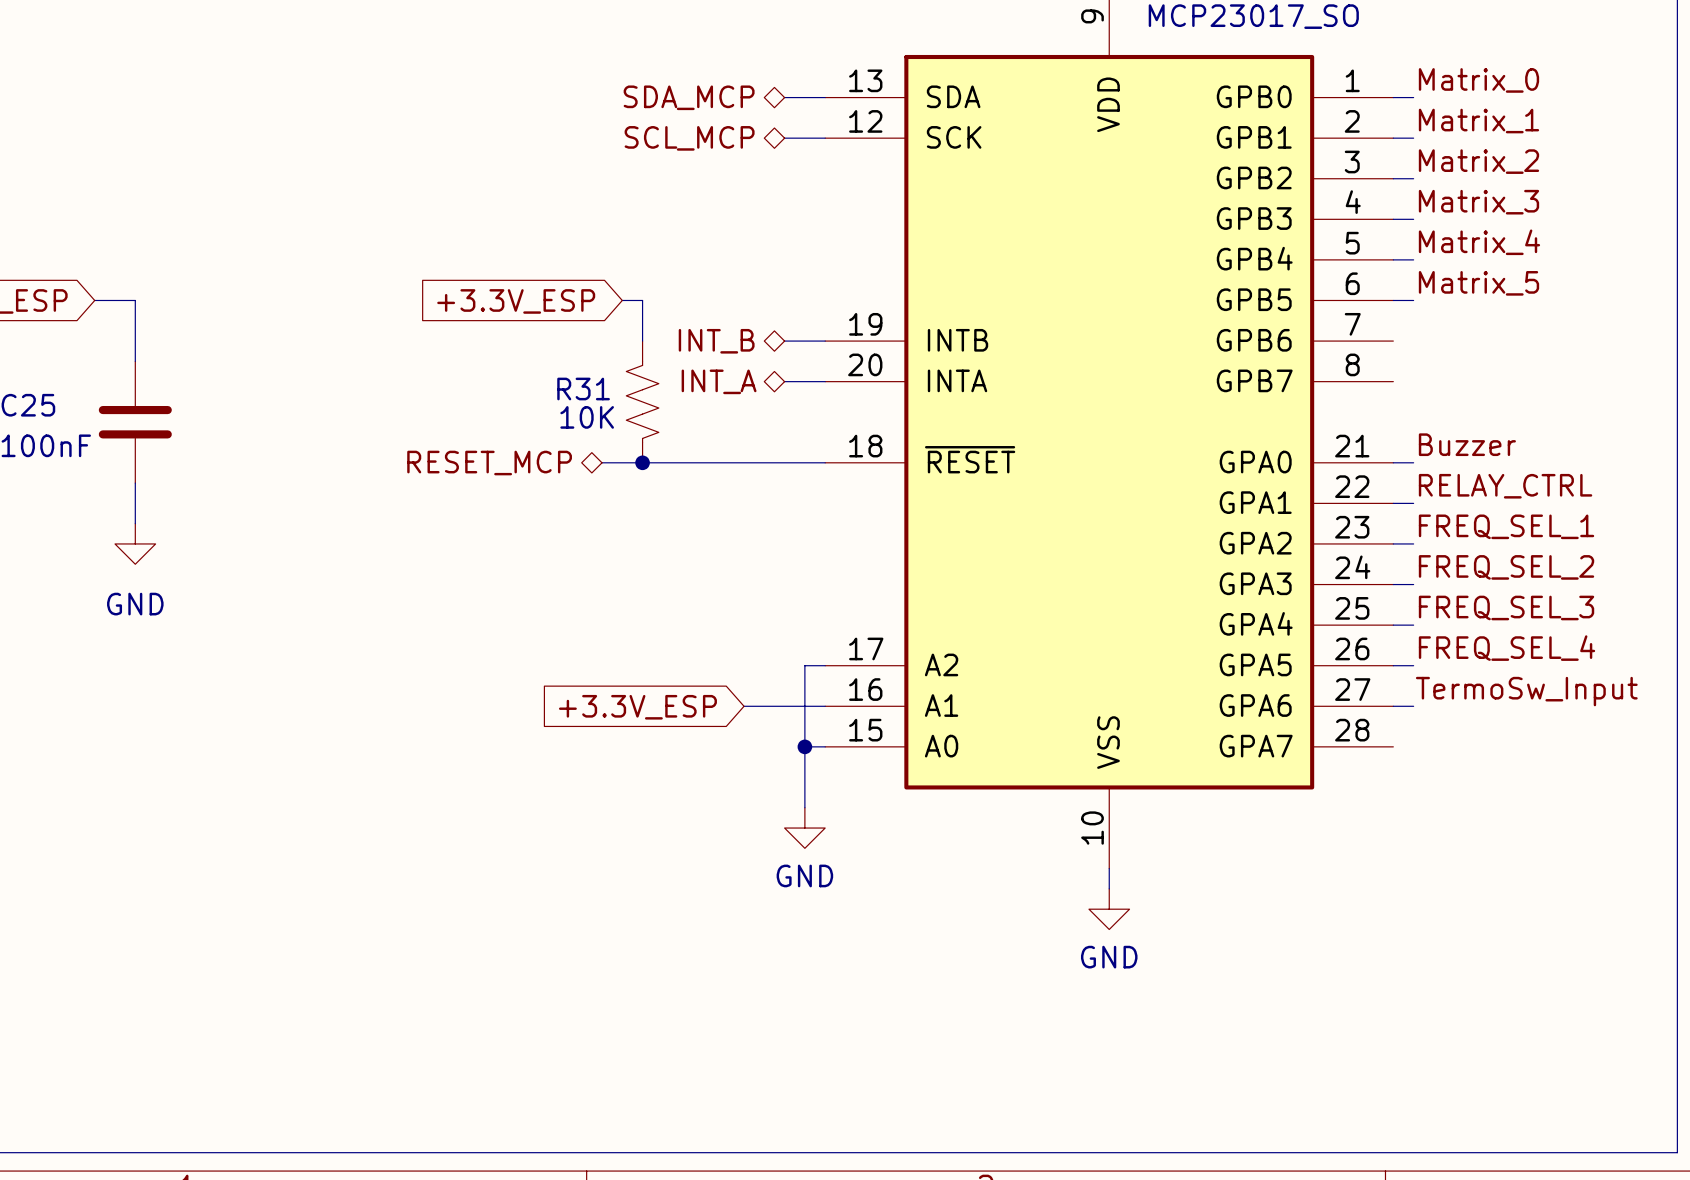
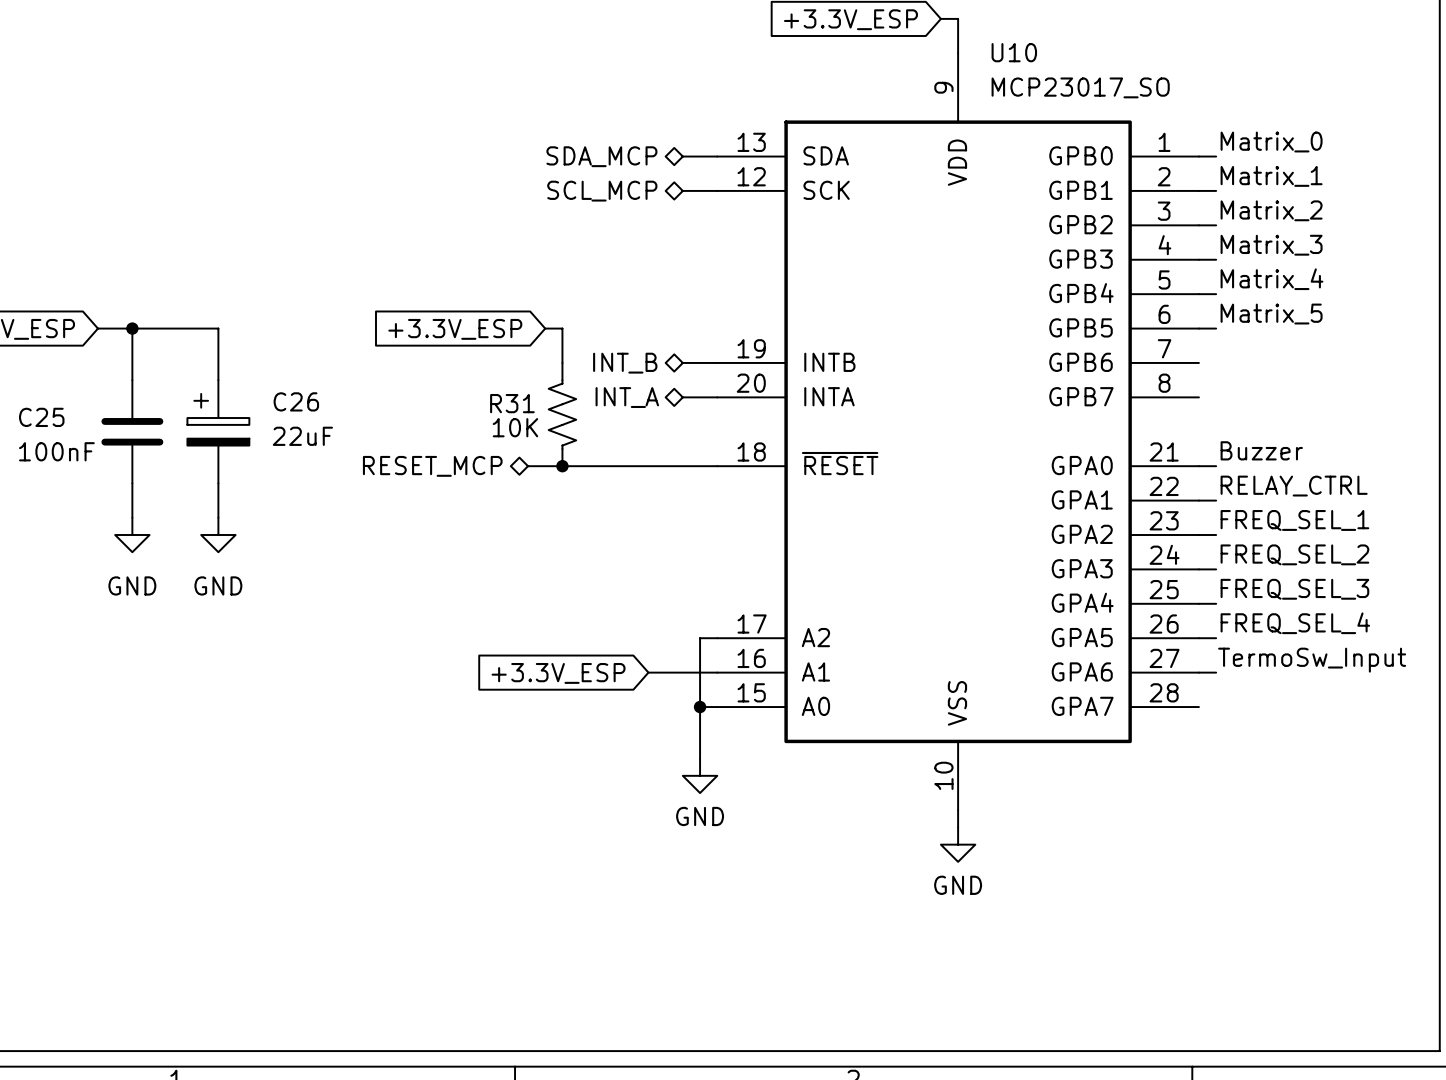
wire: none -> (132, 328) (218, 328) (218, 380)
junction: none -> (132, 328)
C26: none -> 22uF (218, 431)
wire: none -> (218, 483) (218, 517)
power symbol: none -> GND (218, 535)

